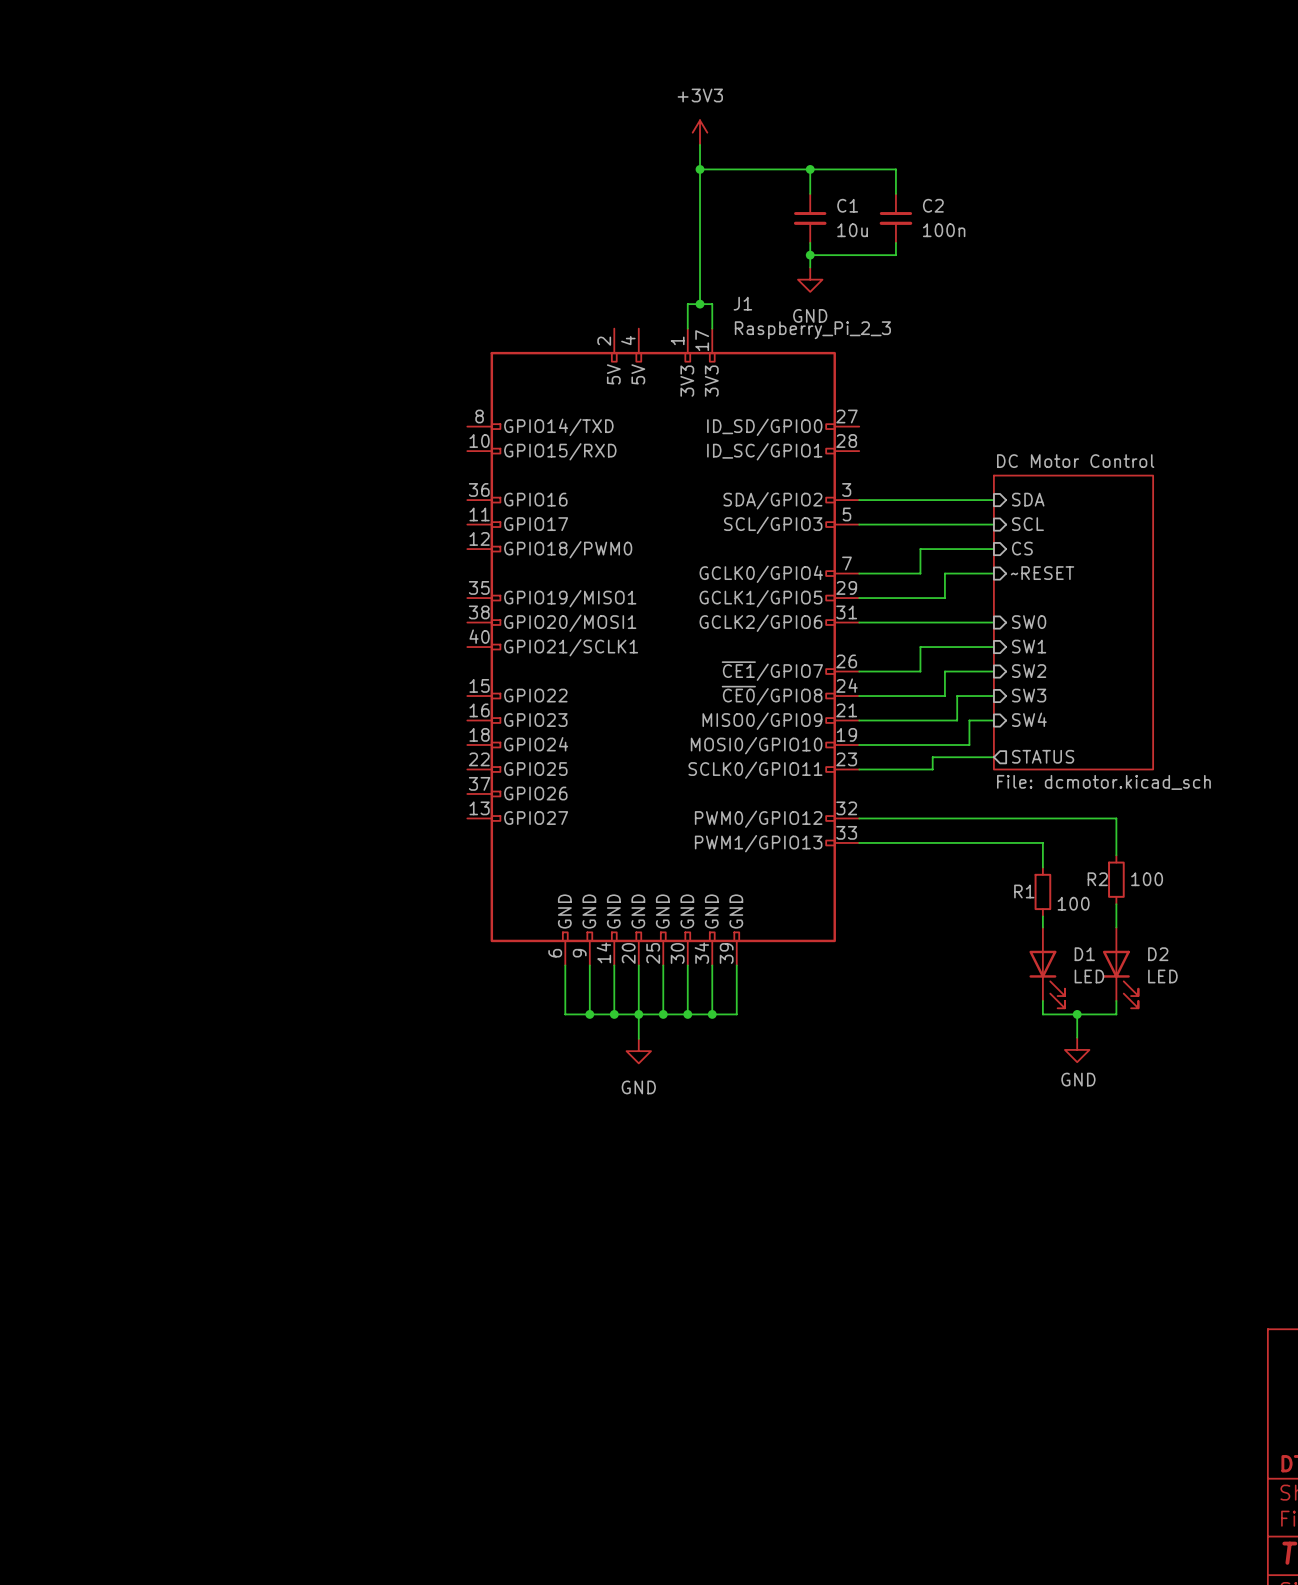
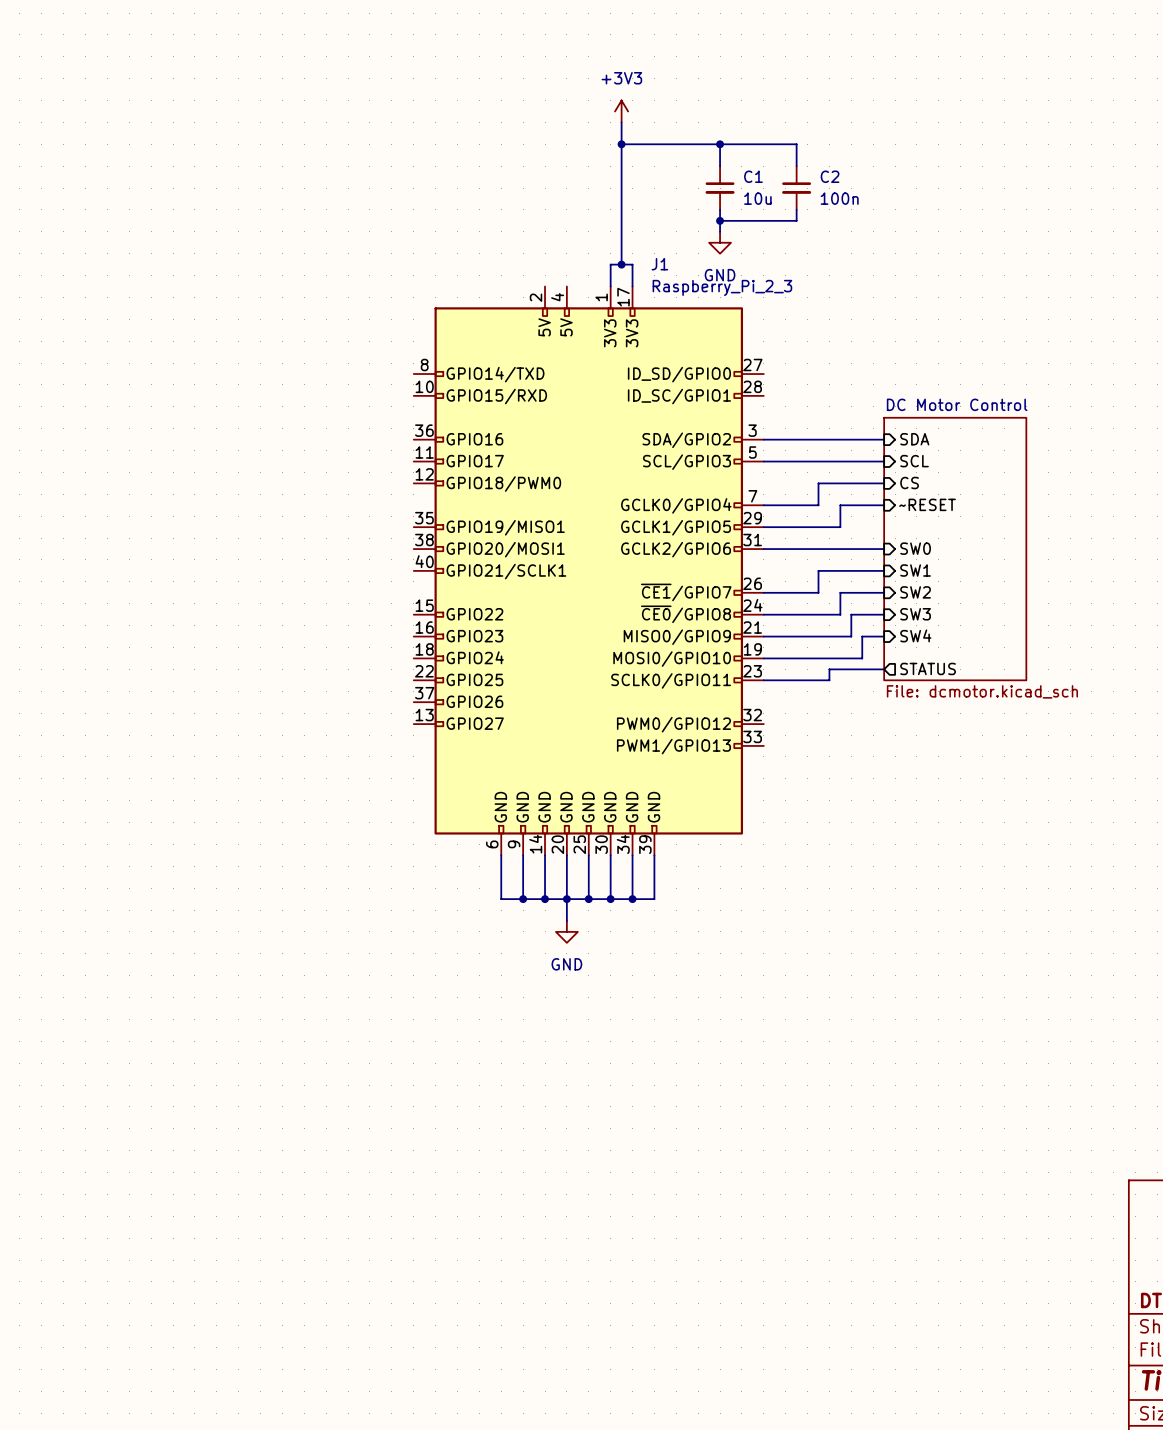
wire: (859, 818) (1116, 818) (1116, 855) -> none
wire: (859, 842) (1042, 842) (1042, 867) -> none
R2: 100 (1116, 879) -> none
R1: 100 (1042, 891) -> none
wire: (1116, 904) (1116, 927) -> none
wire: (1042, 916) (1042, 927) -> none
D1: LED (1047, 967) -> none
D2: LED (1120, 967) -> none
wire: (1042, 1000) (1042, 1014) (1116, 1014) (1116, 1000) -> none
wire: (1077, 1014) (1077, 1037) -> none
junction: (1077, 1014) -> none
power symbol: GND (1077, 1049) -> none

